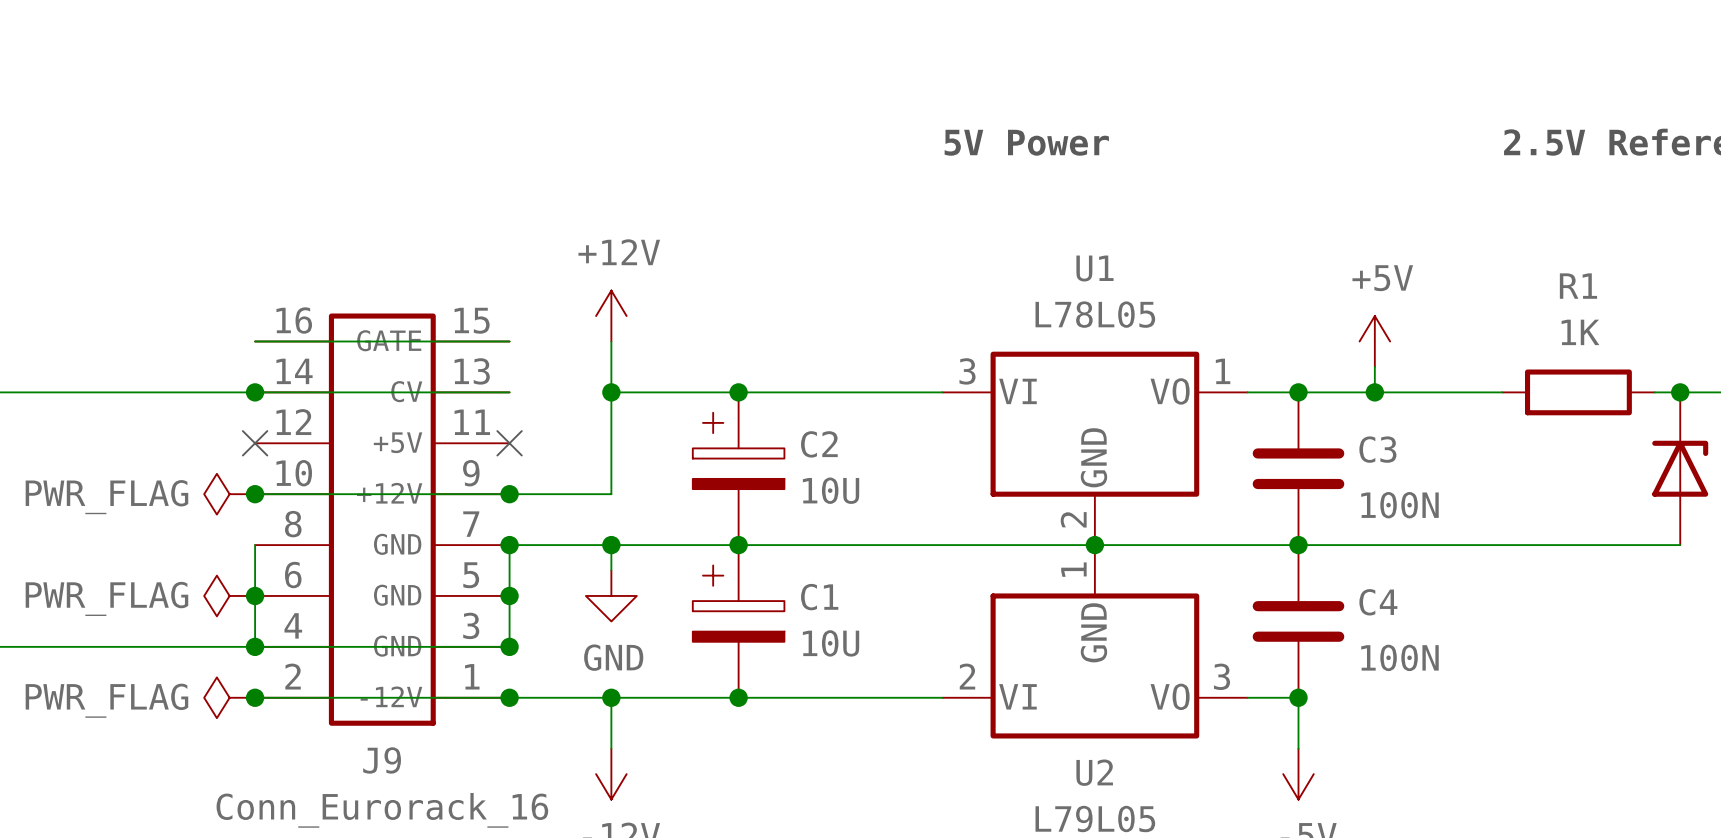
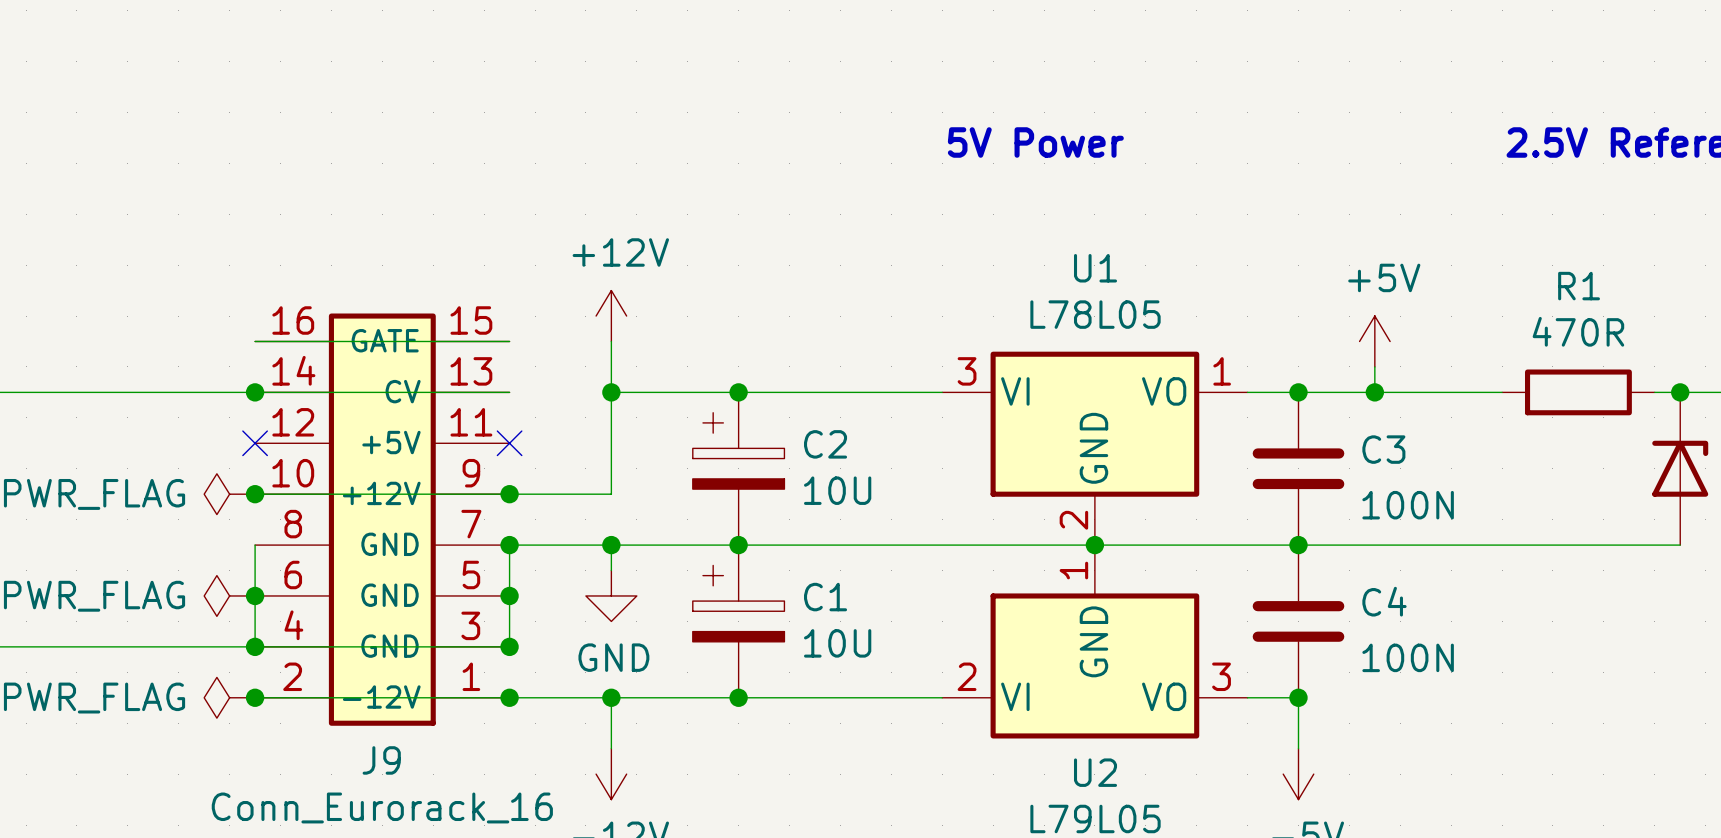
R1 value: 1K (1580, 332) -> 470R (1578, 331)

